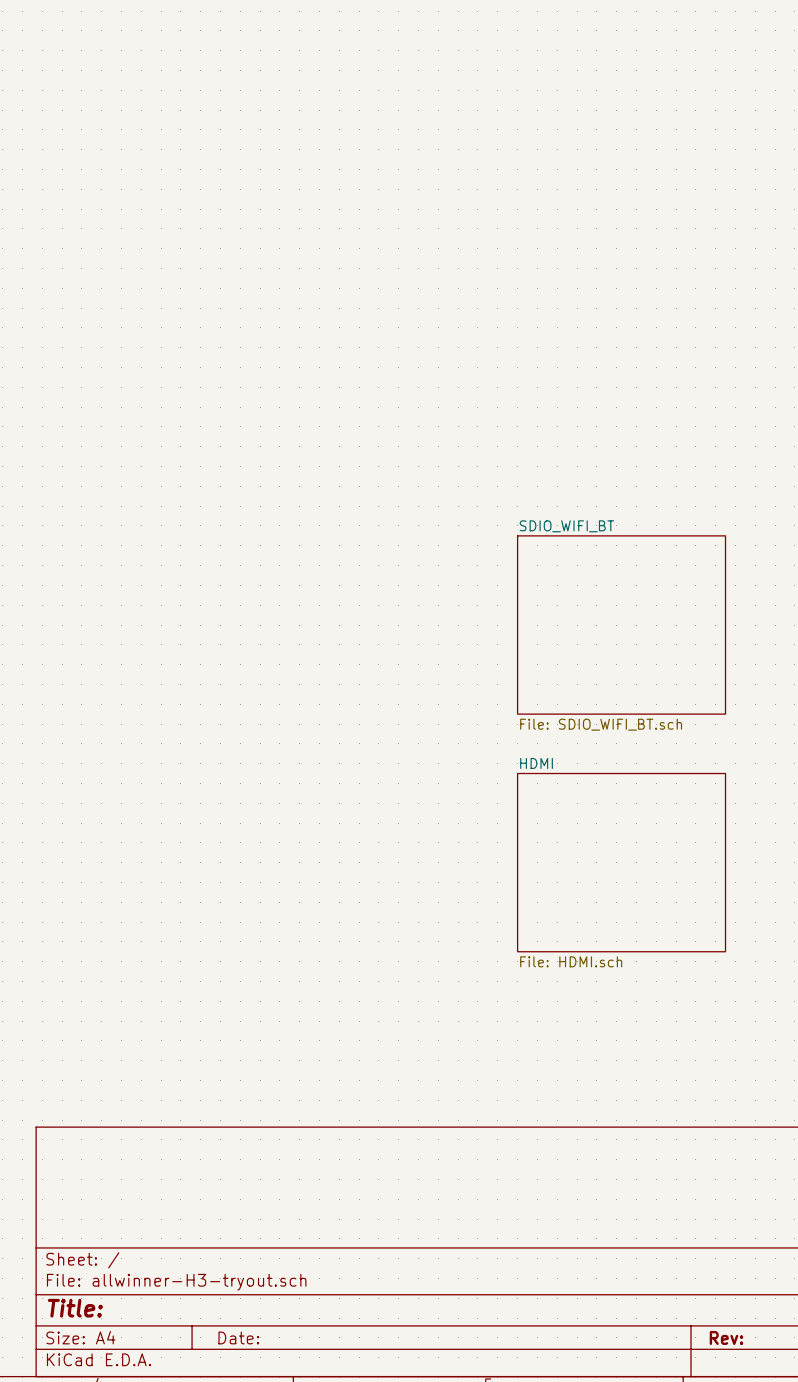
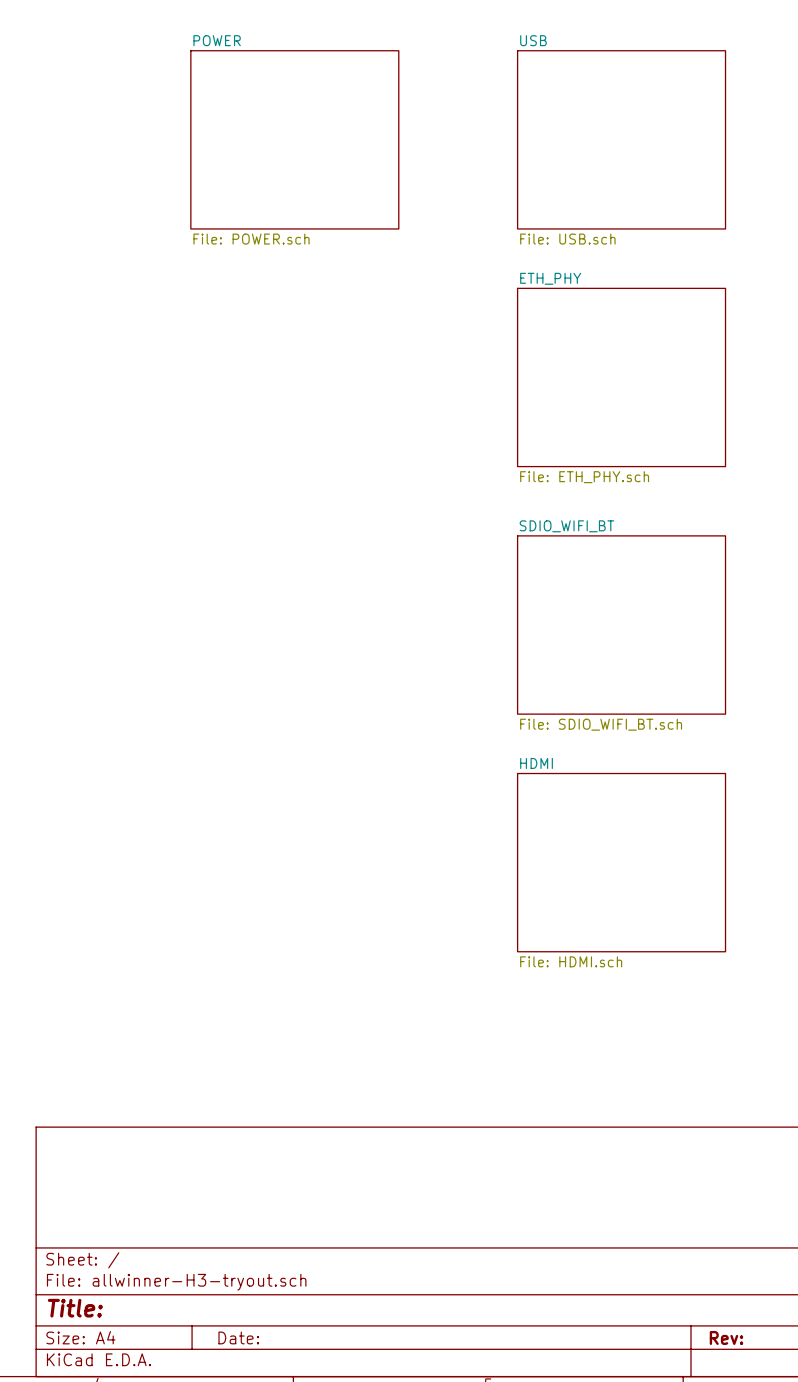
sheet POWER: none -> File: POWER.sch (294, 139)
sheet USB: none -> File: USB.sch (621, 139)
sheet ETH_PHY: none -> File: ETH_PHY.sch (621, 377)

